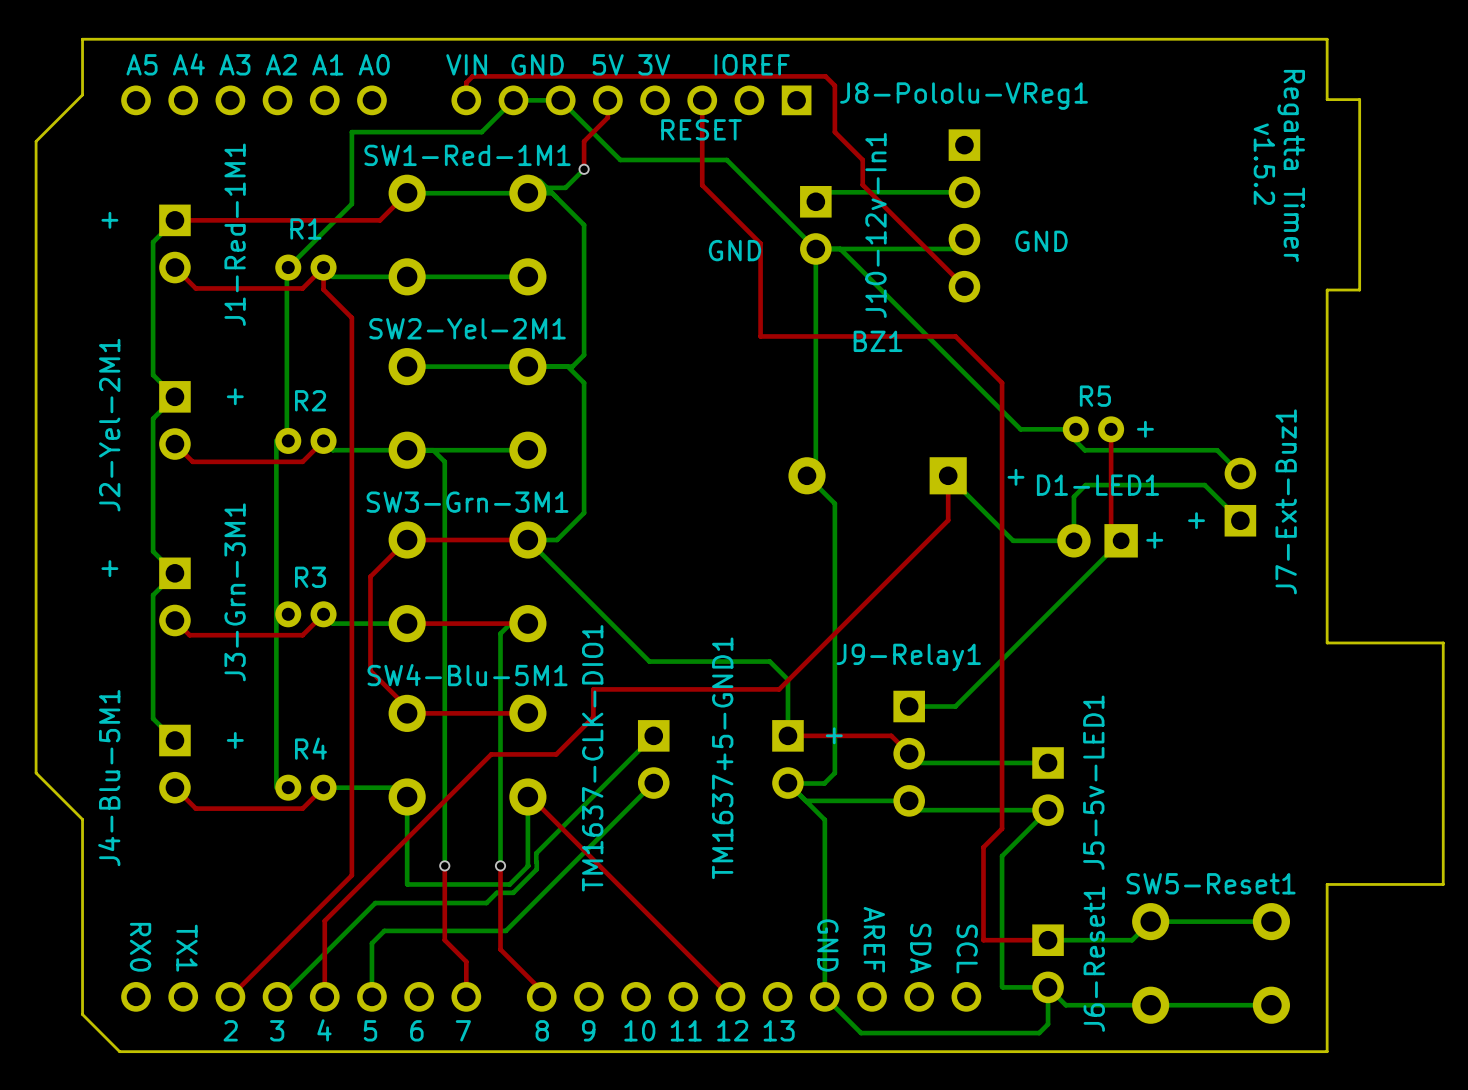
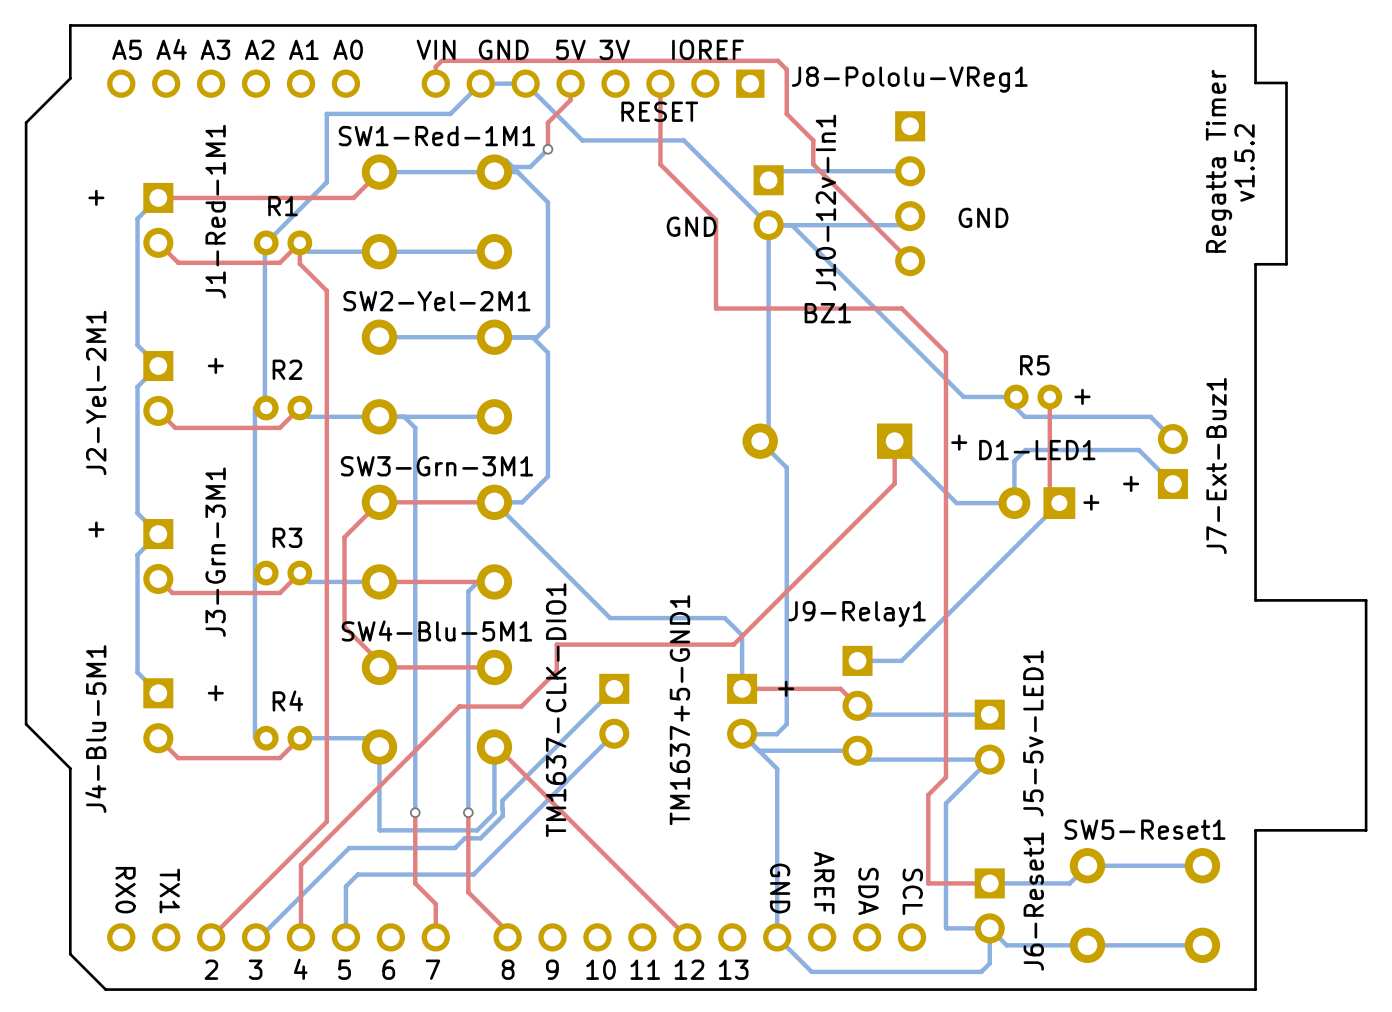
text rotation: 0° (1264, 164) -> 180° (1244, 162)
text rotation: 0° (1291, 165) -> 180° (1219, 161)

